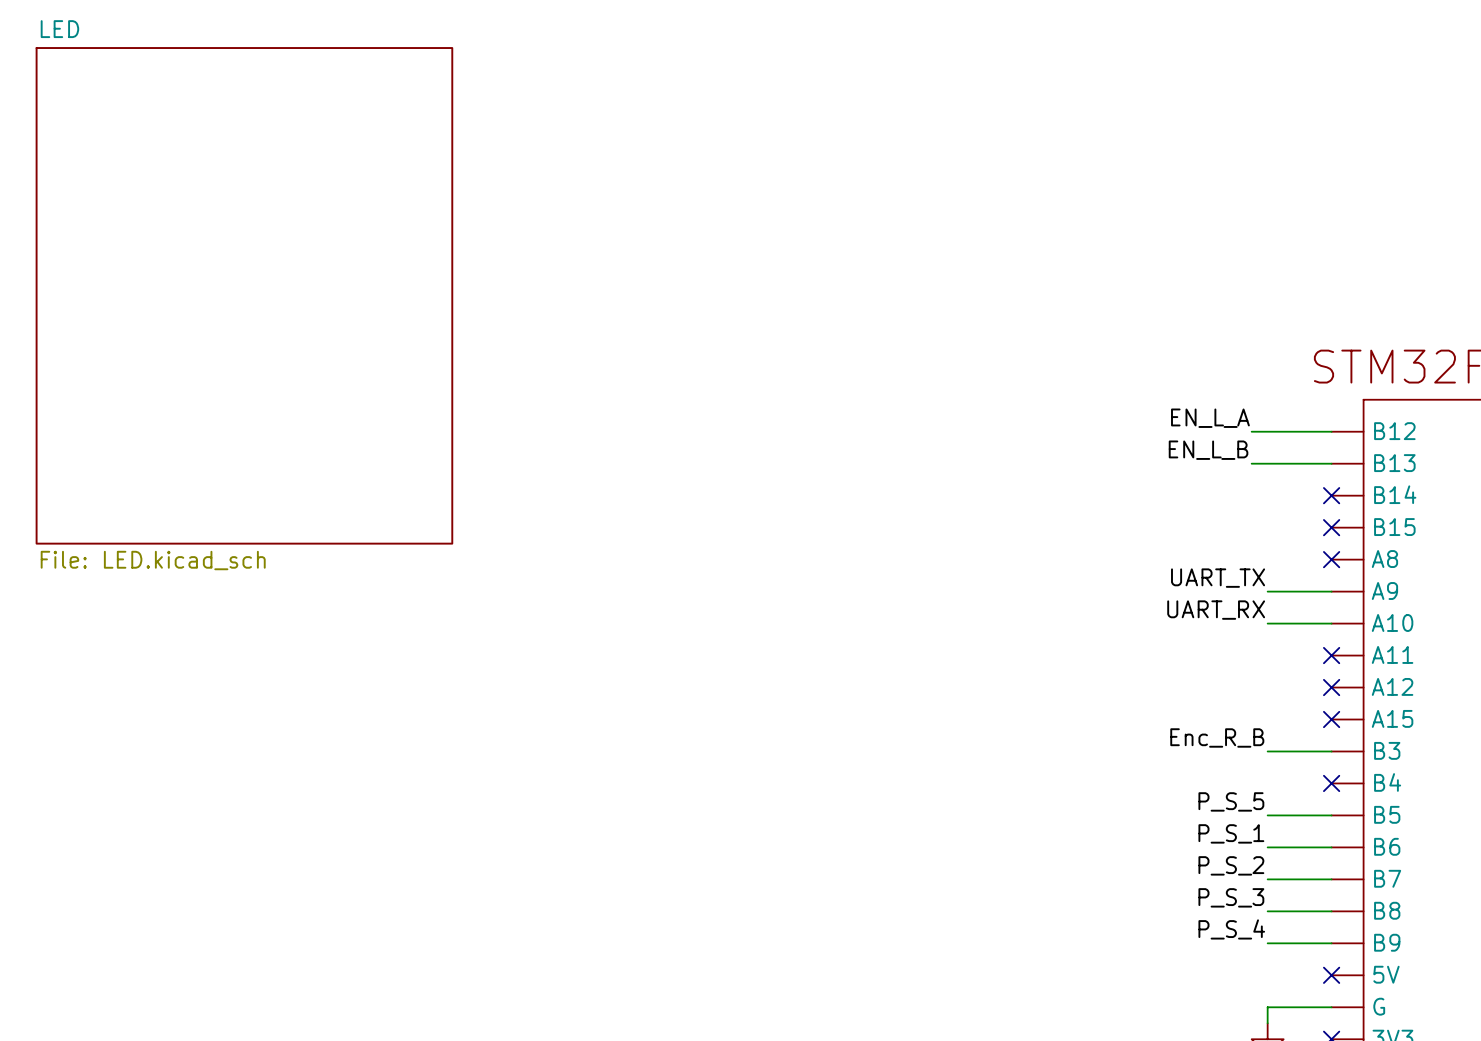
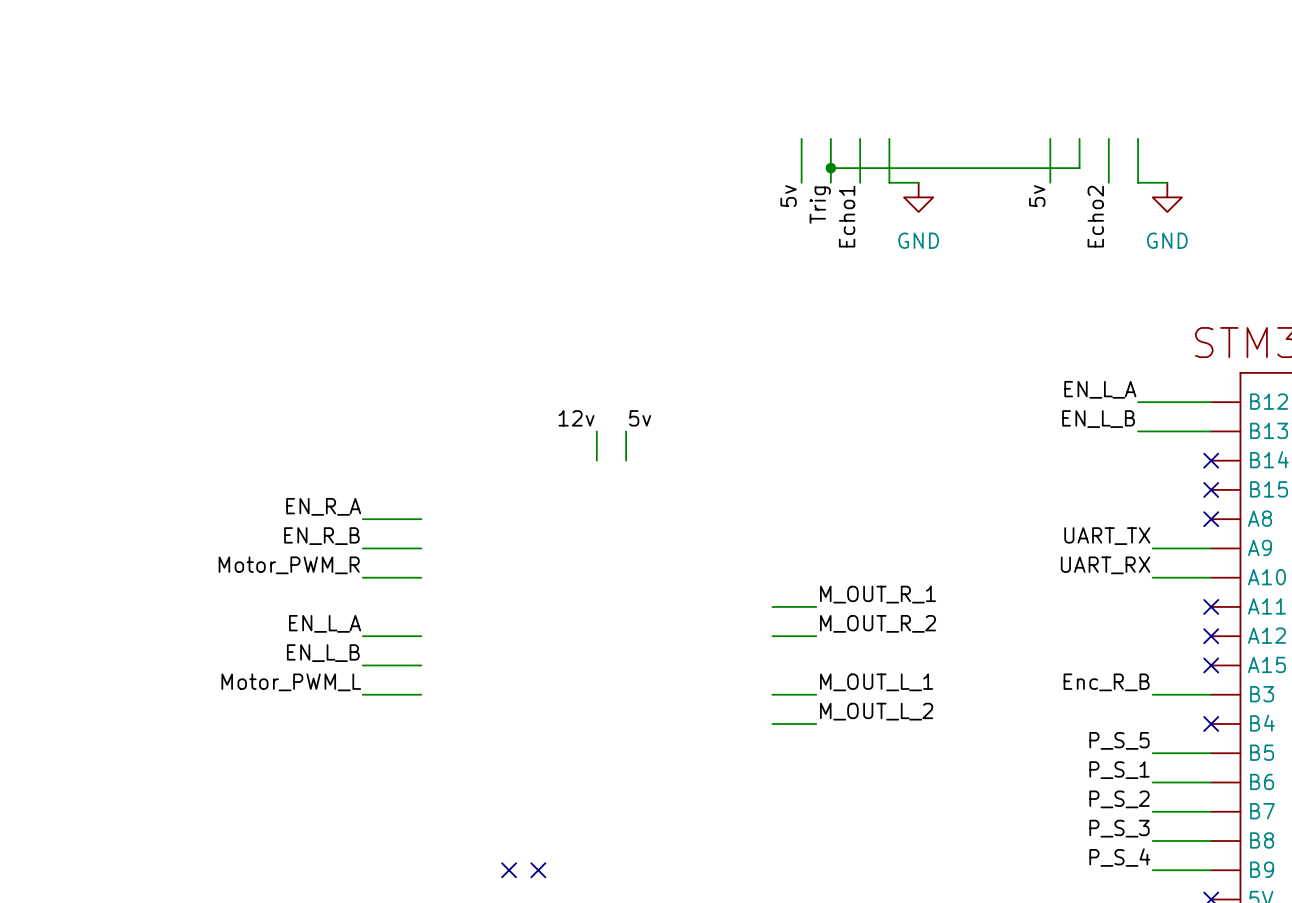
wire: none -> (801, 138) (801, 182)
wire: none -> (830, 138) (830, 182)
wire: none -> (860, 138) (860, 182)
wire: none -> (889, 138) (889, 182) (918, 182)
wire: none -> (1050, 138) (1050, 182)
wire: none -> (1079, 138) (1079, 168) (830, 168)
wire: none -> (1108, 138) (1108, 182)
wire: none -> (1138, 138) (1138, 182) (1167, 182)
junction: none -> (830, 168)
label: none -> 5v (788, 196)
label: none -> 5v (1037, 196)
power symbol: none -> GND (918, 197)
power symbol: none -> GND (1167, 197)
label: none -> Trig (820, 205)
label: none -> Echo1 (847, 216)
label: none -> Echo2 (1095, 216)
sheet LED: File: LED.kicad_sch (244, 295) -> none
label: none -> 12v (576, 418)
label: none -> 5v (640, 418)
wire: none -> (596, 431) (596, 460)
wire: none -> (626, 431) (626, 460)
label: none -> EN_R_A (323, 506)
wire: none -> (362, 519) (421, 519)
label: none -> EN_R_B (321, 536)
wire: none -> (362, 548) (421, 548)
label: none -> Motor_PWM_R (289, 565)
wire: none -> (362, 577) (421, 577)
label: none -> M_OUT_R_1 (878, 594)
wire: none -> (772, 606) (816, 606)
label: none -> EN_L_A (325, 623)
label: none -> M_OUT_R_2 (878, 623)
wire: none -> (362, 636) (421, 636)
wire: none -> (772, 636) (816, 636)
label: none -> EN_L_B (323, 653)
wire: none -> (362, 665) (421, 665)
label: none -> Motor_PWM_L (291, 682)
label: none -> M_OUT_L_1 (876, 682)
wire: none -> (362, 694) (421, 694)
wire: none -> (772, 694) (816, 694)
label: none -> M_OUT_L_2 (876, 711)
wire: none -> (772, 723) (816, 723)
no-connect mark: none -> (509, 870)
no-connect mark: none -> (538, 870)

